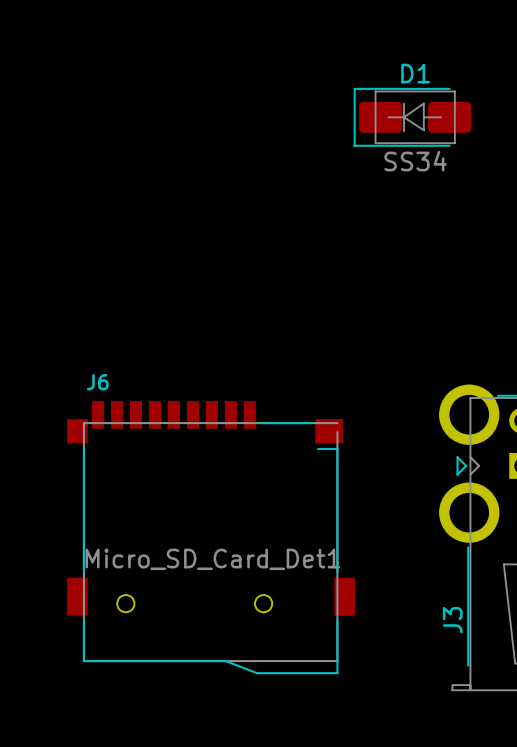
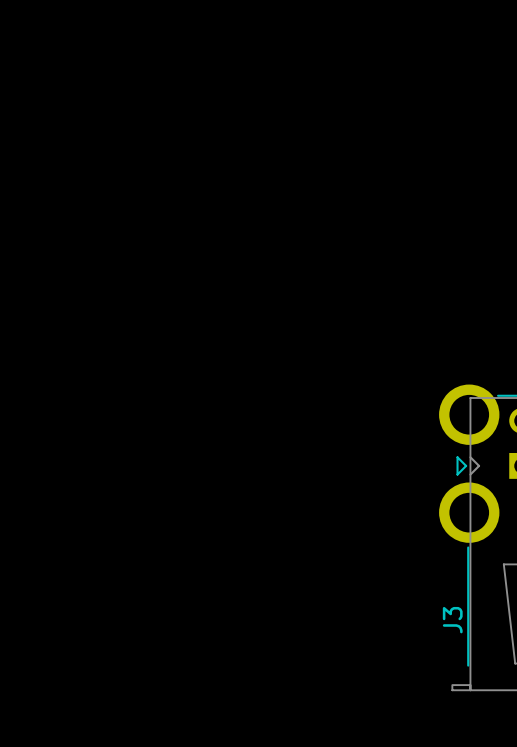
D1: SS34 (412, 117) -> none
J6: Micro_SD_Card_Det1 (211, 537) -> none

